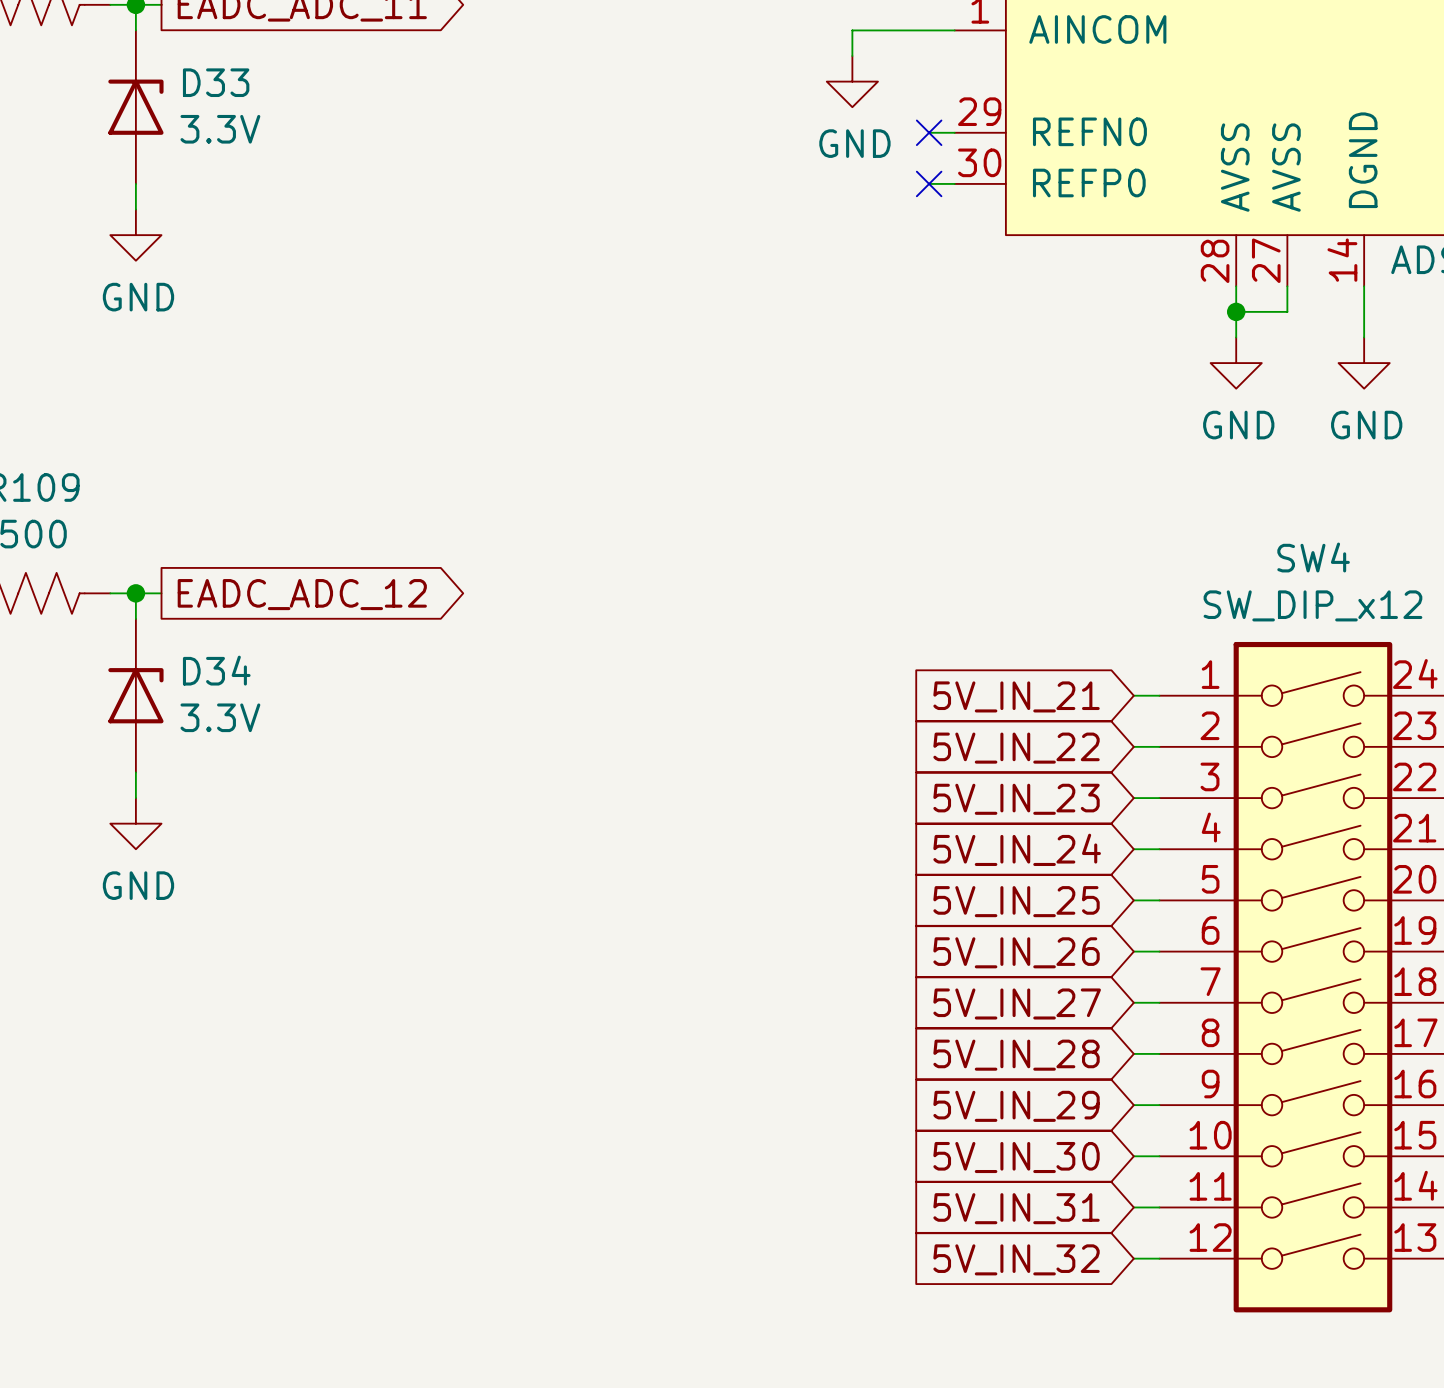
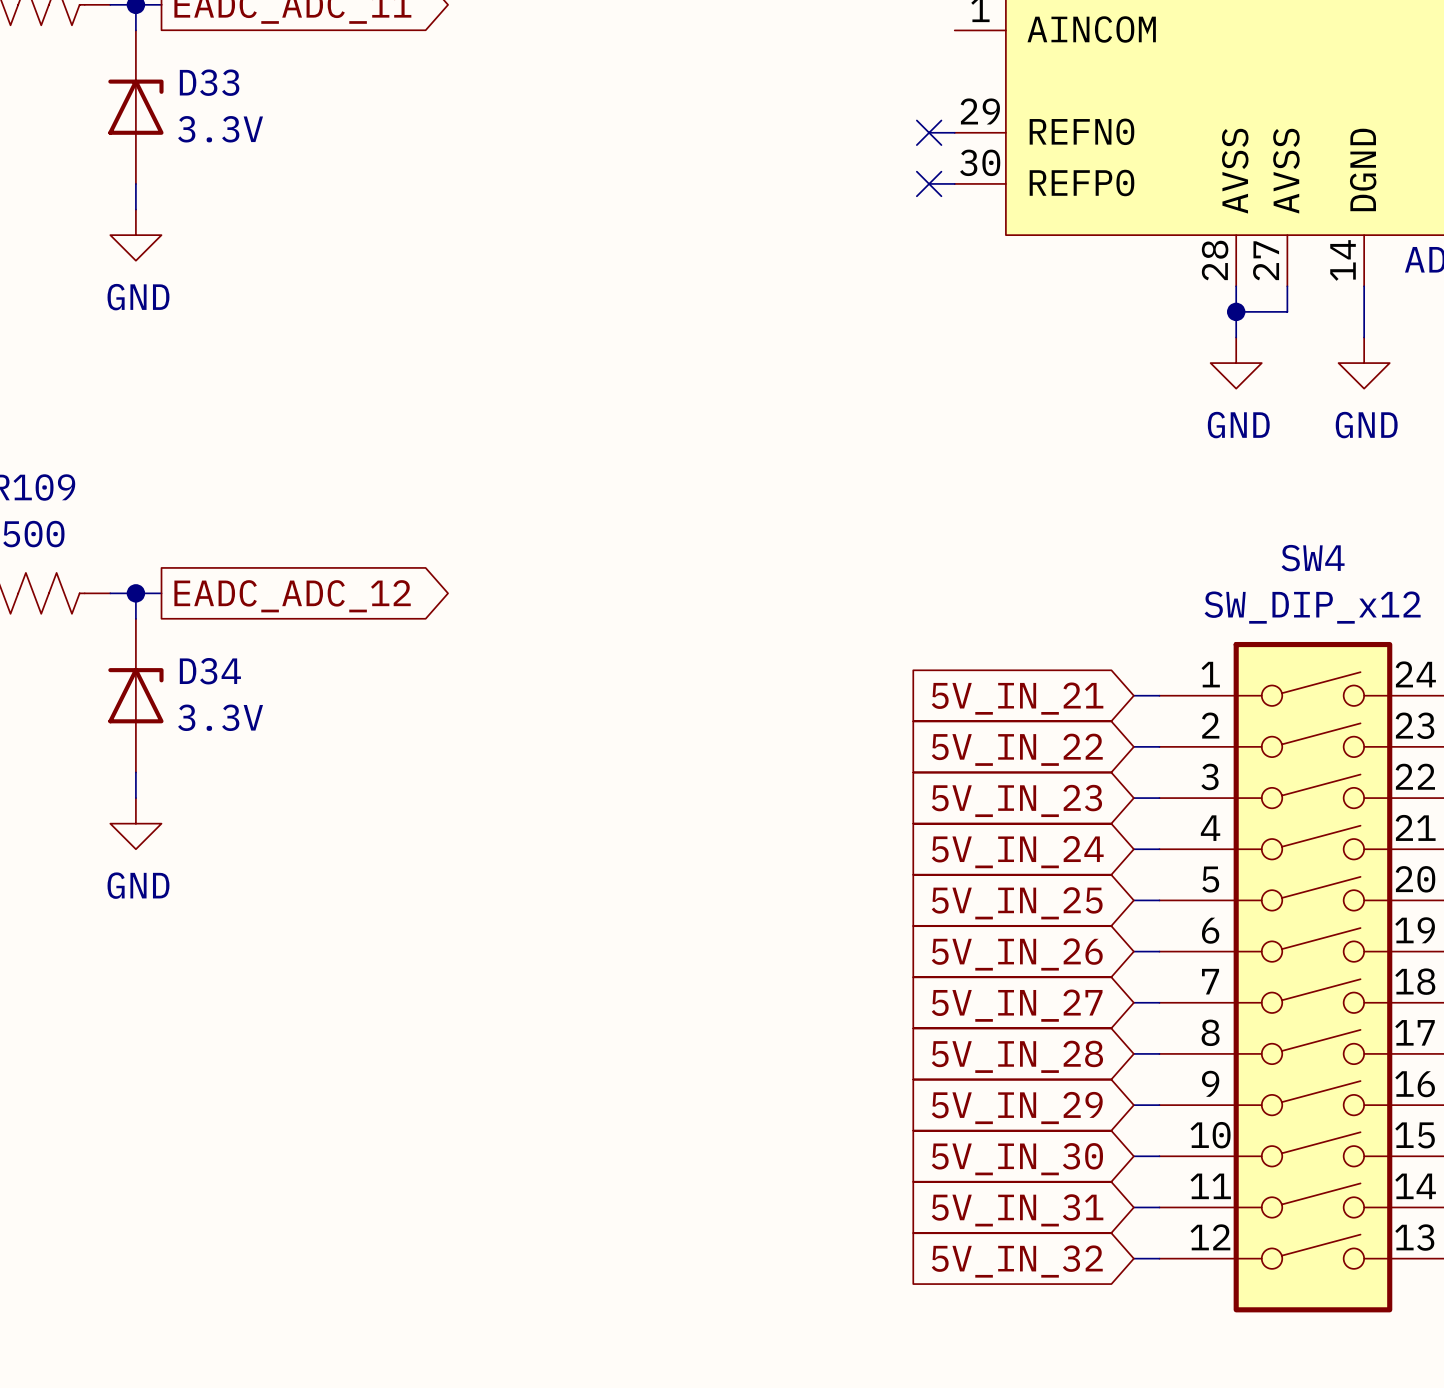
wire: (954, 30) (852, 30) (852, 56) -> none
power symbol: GND (852, 81) -> none

